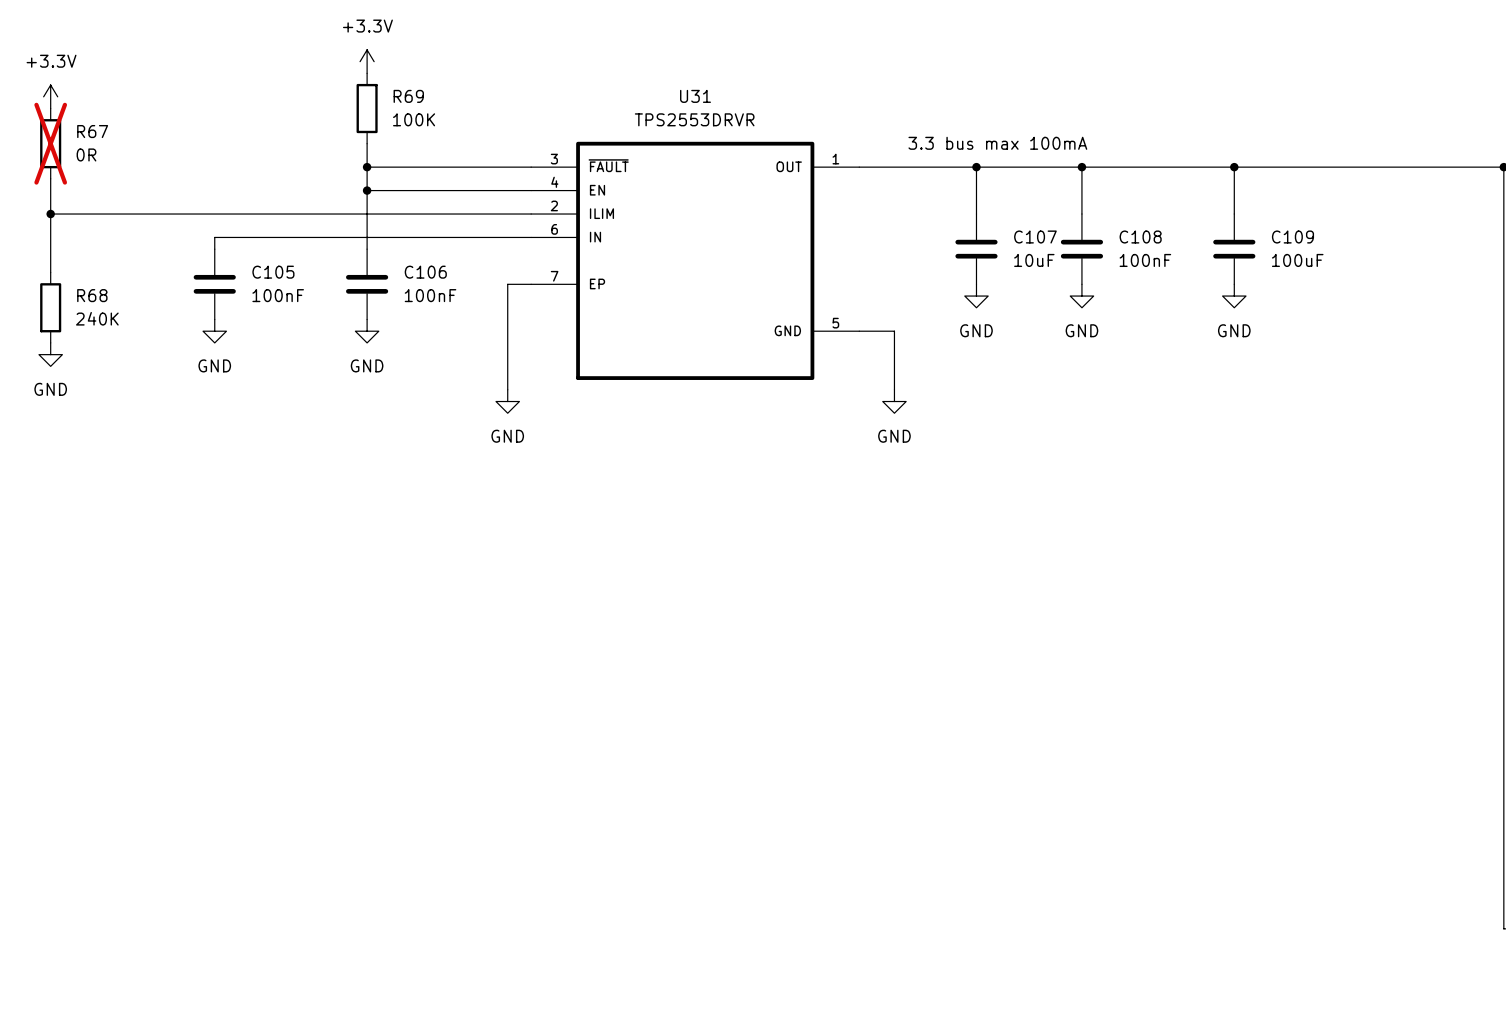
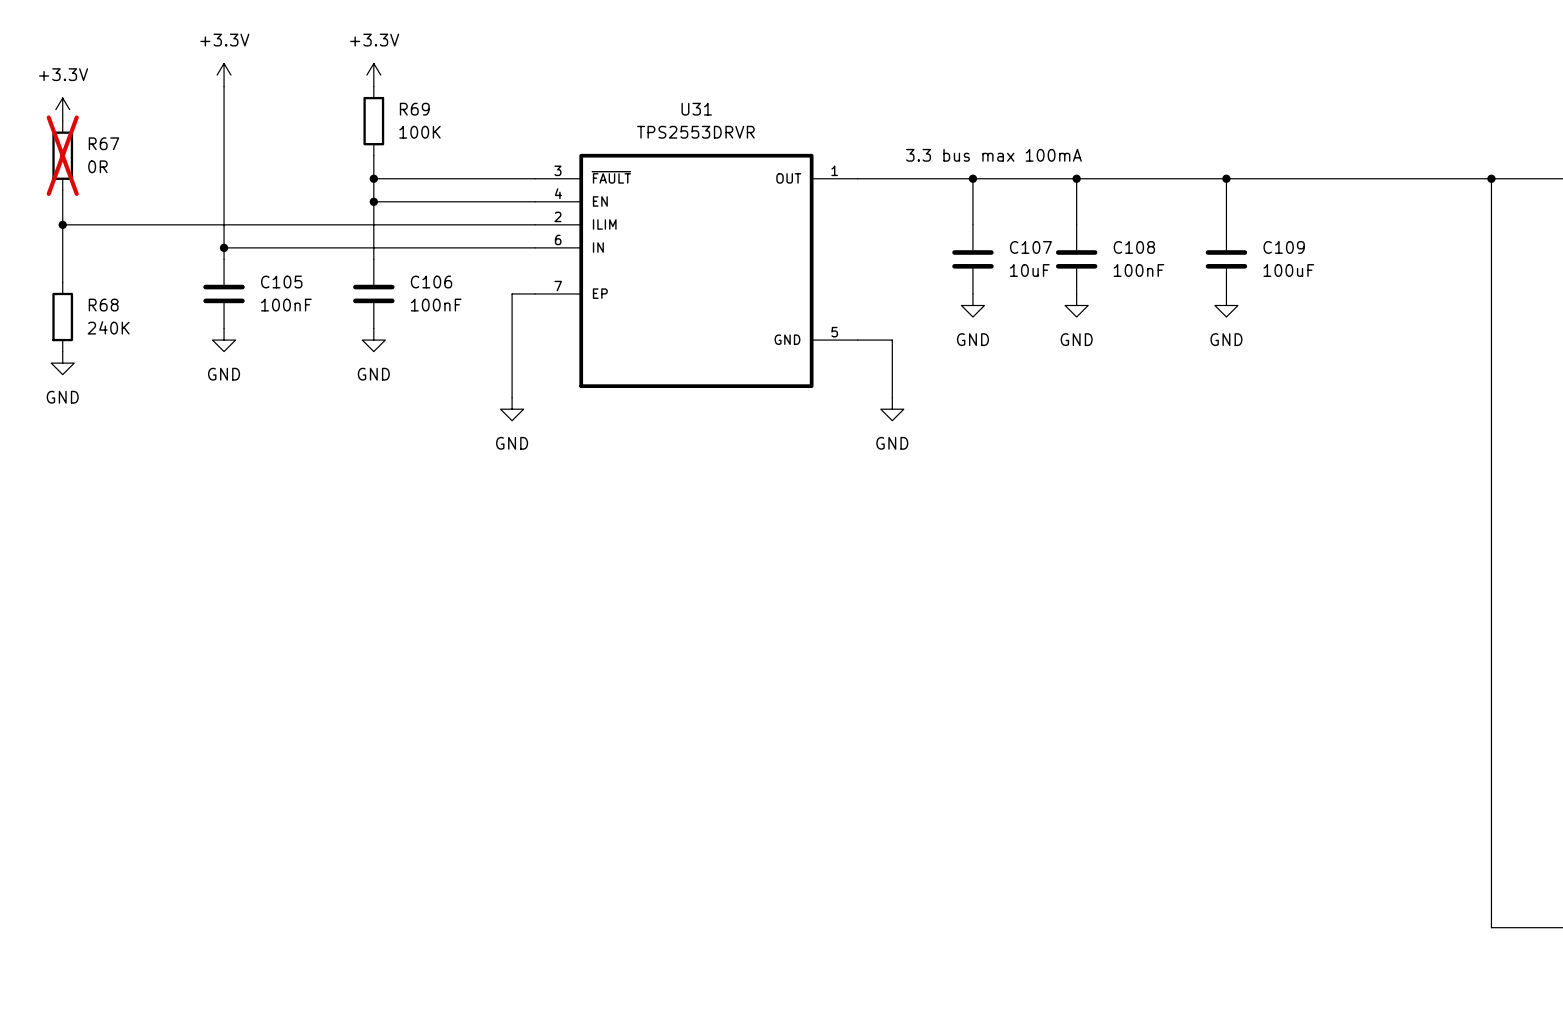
power symbol: none -> +3.3V (224, 75)
wire: none -> (224, 86) (224, 247)
junction: none -> (224, 247)

